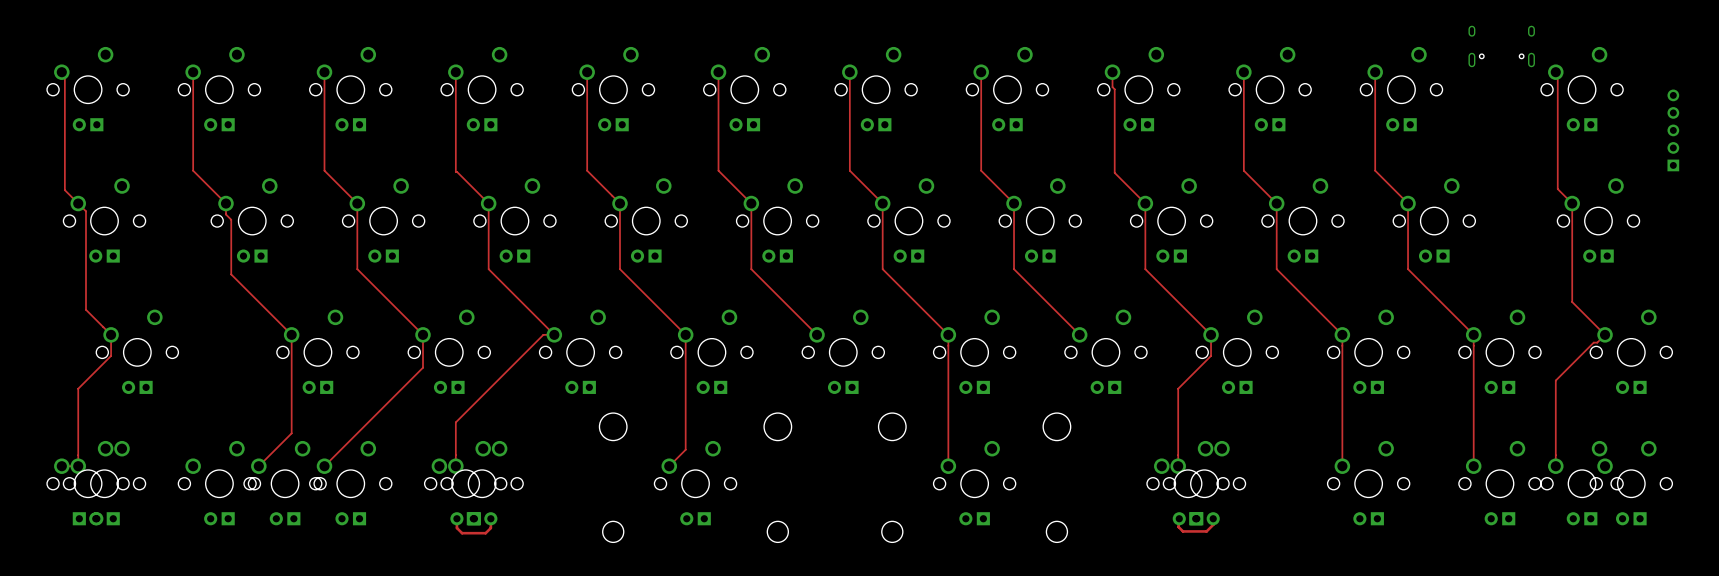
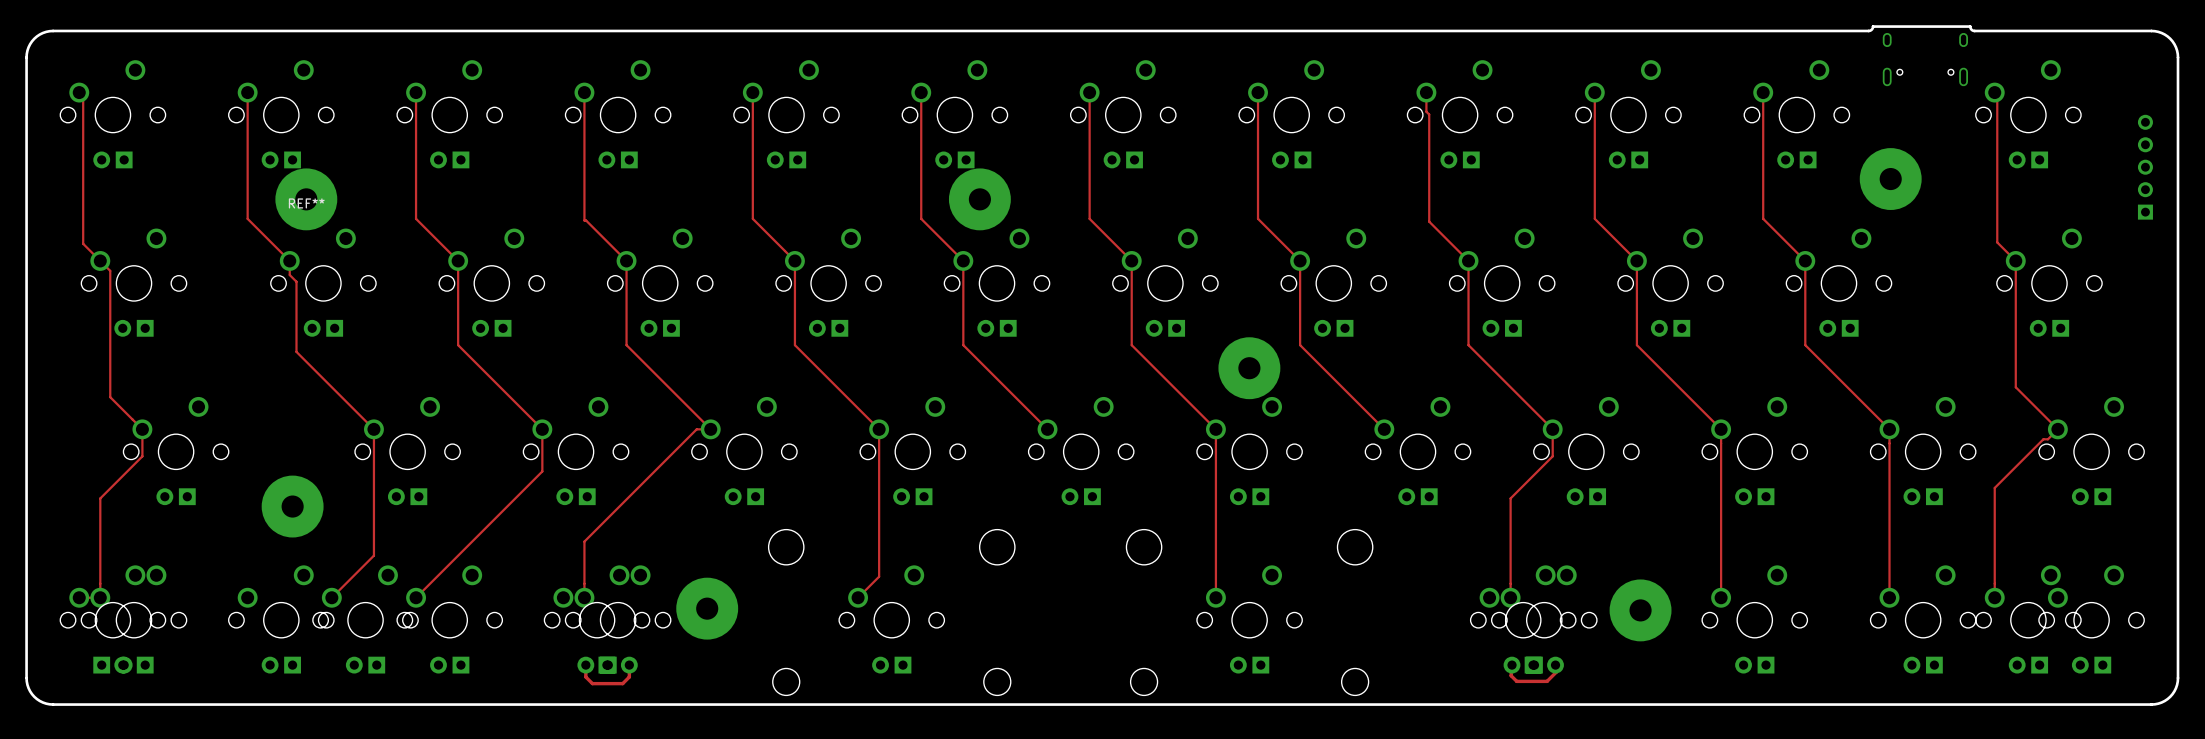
REF**: none -> (1102, 365)

